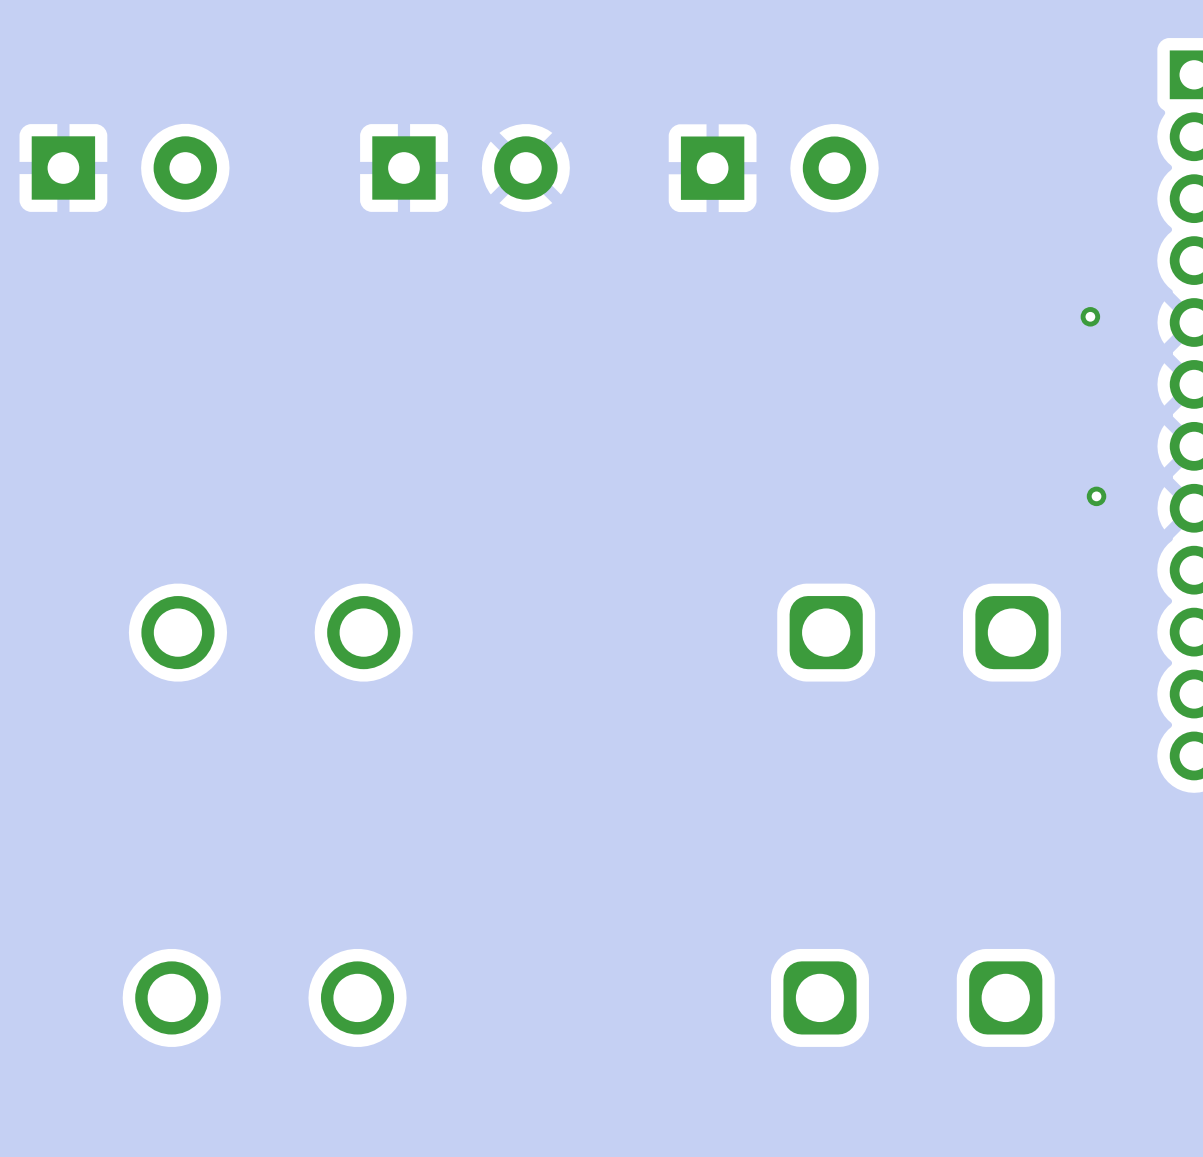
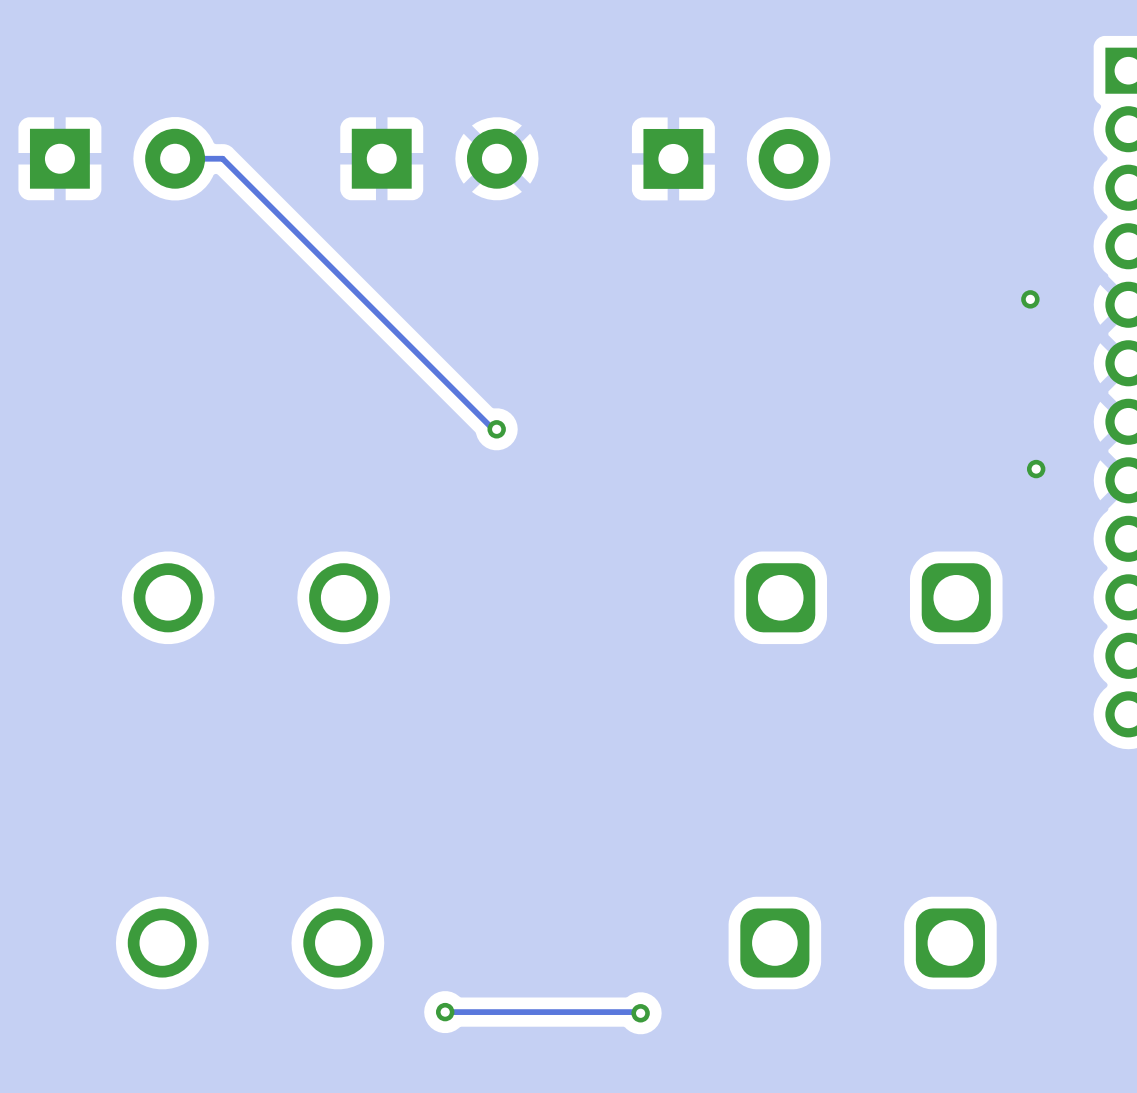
track: none -> (175, 158) (222, 158) (493, 429) (496, 429)
via: none -> (496, 429)
track: none -> (445, 1012) (640, 1013)
via: none -> (445, 1012)
via: none -> (640, 1013)

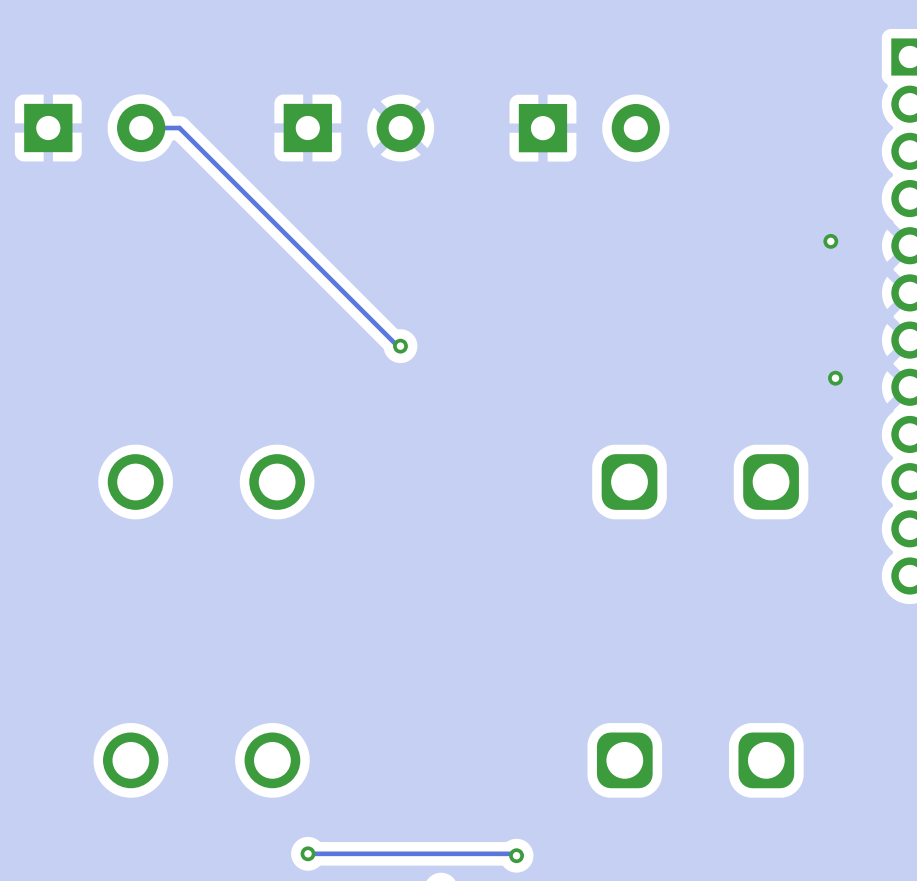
track: (445, 1012) (640, 1013) -> none
via: (445, 1012) -> none
via position: (640, 1013) -> (516, 855)
track: none -> (308, 853) (514, 853) (516, 855)
via: none -> (308, 853)

